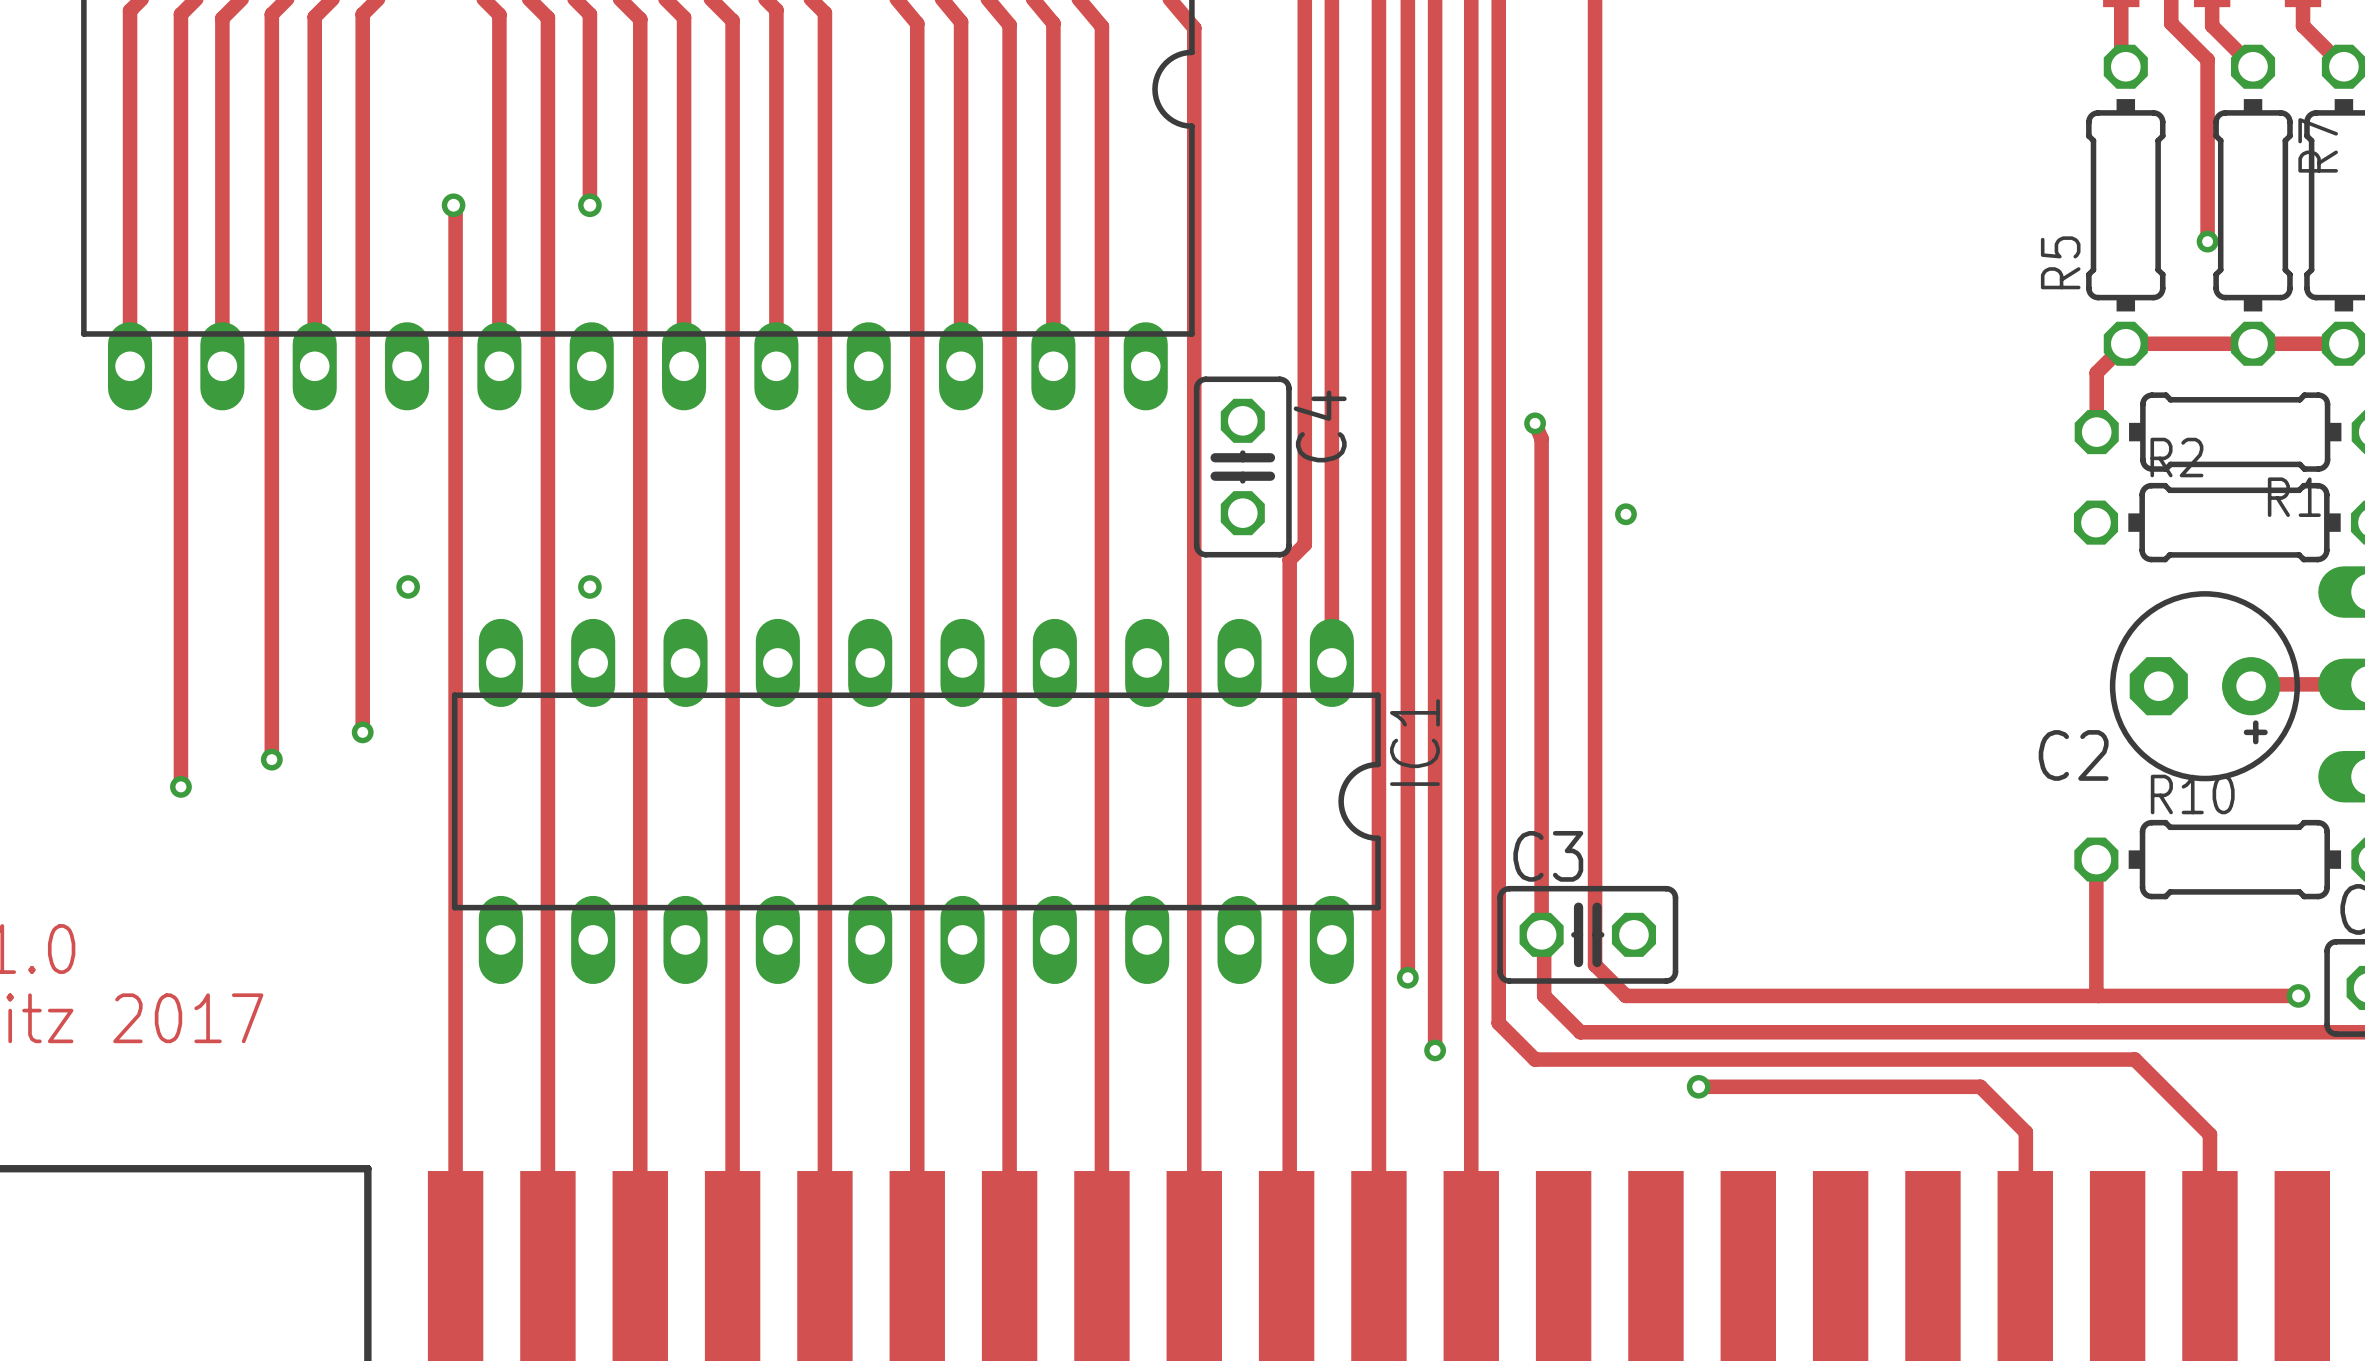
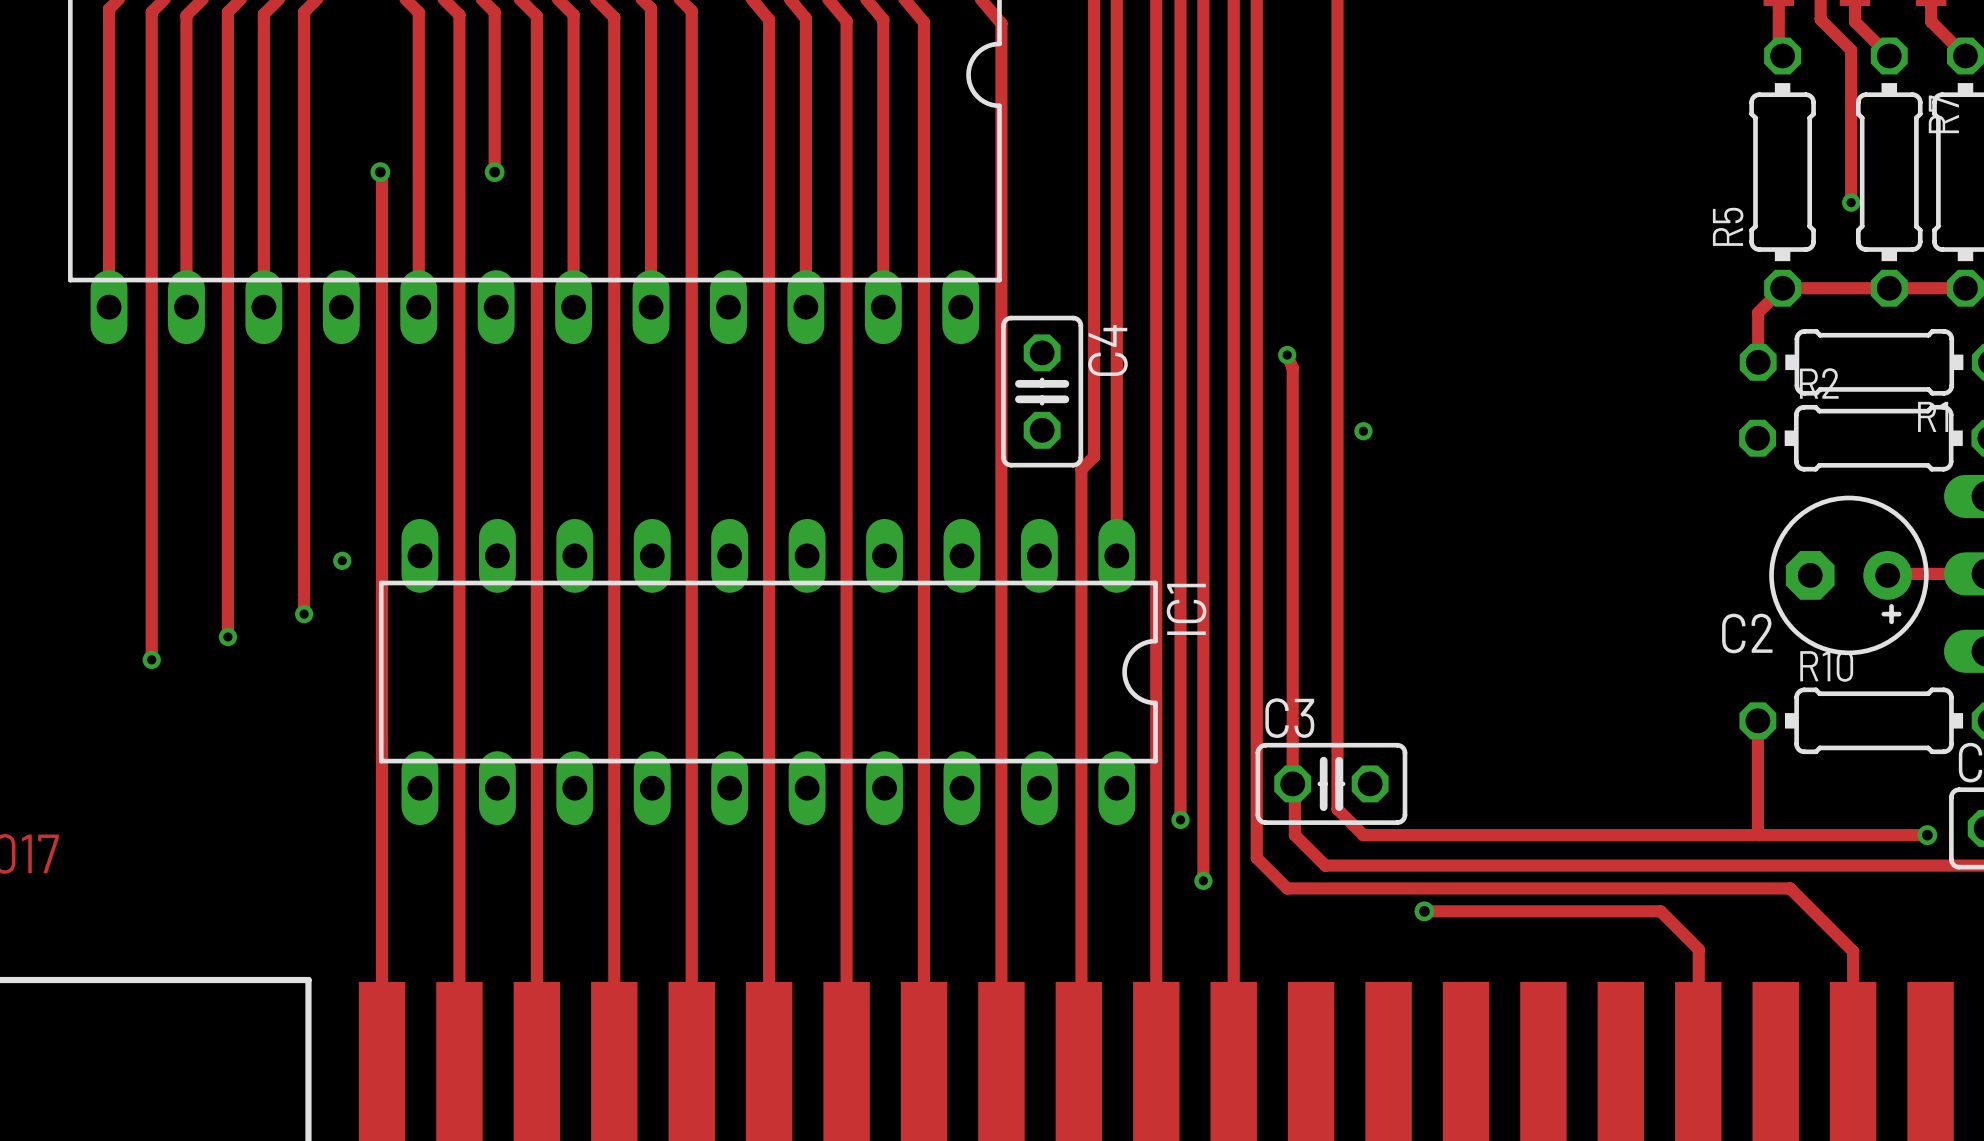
via: (408, 586) -> none
via: (589, 586) -> none
via: none -> (342, 560)

